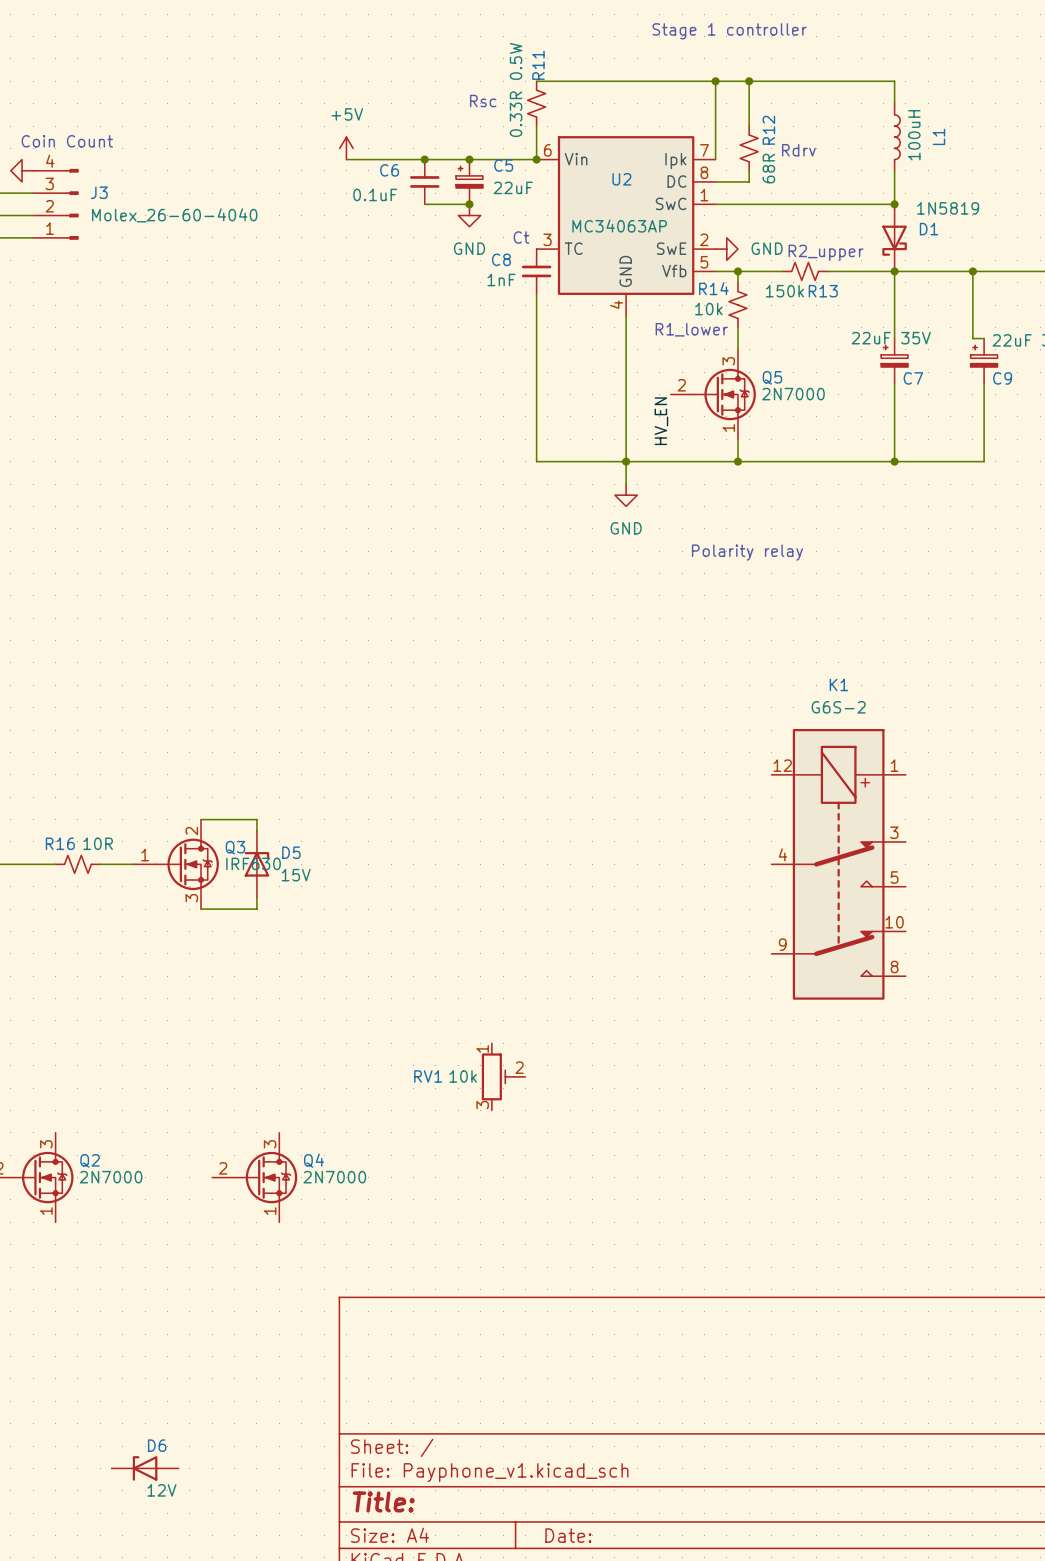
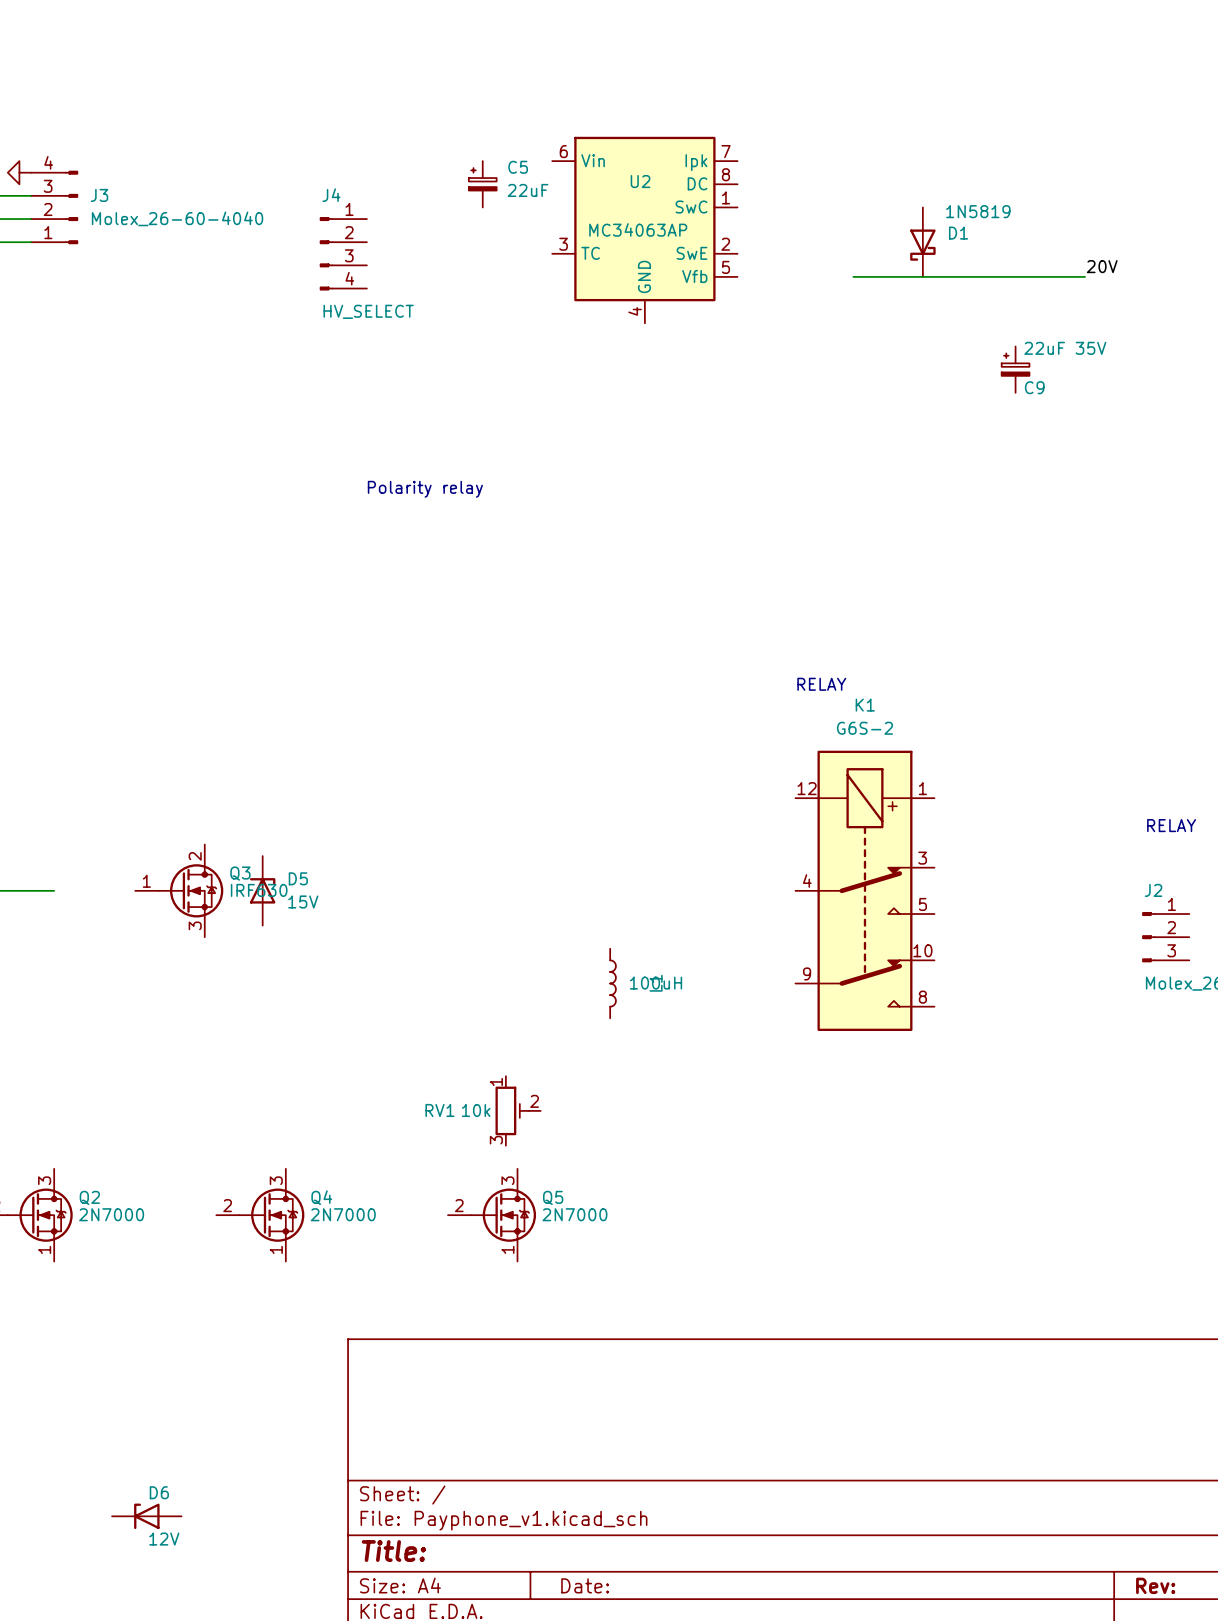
text: Stage 1 controller (729, 31) -> none
wire: (536, 81) (894, 81) (894, 103) -> none
wire: (715, 81) (715, 159) -> none
junction: (715, 81) -> none
wire: (749, 81) (749, 126) -> none
junction: (749, 81) -> none
text: Rsc (483, 101) -> none
R11: 0.33R 0.5W (536, 103) -> none
wire: (536, 126) (536, 159) (346, 159) -> none
L1 value rotation: 0° (914, 135) -> 90° clockwise (656, 983)
L1 position: (897, 137) -> (613, 983)
text: Coin Count (67, 141) -> none
power symbol: +5V (346, 148) -> none
R12: 68R (749, 148) -> none
text: Rdrv (798, 150) -> none
junction: (424, 159) -> none
junction: (469, 159) -> none
junction: (536, 159) -> none
wire: (749, 170) (749, 181) (715, 181) -> none
wire: (894, 170) (894, 204) (715, 204) -> none
C6: 0.1uF (424, 181) -> none
wire: (424, 204) (469, 204) -> none
junction: (469, 204) -> none
junction: (894, 204) -> none
power symbol: GND (469, 215) -> none
text: Ct (521, 237) -> none
J4: none -> HV_SELECT (343, 253)
power symbol: GND (726, 249) -> none
text: R2_upper (826, 252) -> none
C8: 1nF (536, 271) -> none
wire: (715, 271) (782, 271) -> none
wire: (737, 271) (737, 282) -> none
junction: (737, 271) -> none
R13: 150k (805, 271) -> none
wire: (894, 271) (894, 338) -> none
junction: (894, 271) -> none
wire: (972, 271) (972, 338) (984, 338) -> none
junction: (972, 271) -> none
wire: (536, 293) (536, 461) (984, 461) (984, 383) -> none
R14: 10k (737, 305) -> none
wire: (626, 316) (626, 484) -> none
wire: (737, 327) (737, 349) -> none
text: R1_lower (691, 329) -> none
C7: 22uF 35V (894, 360) -> none
wire: (894, 383) (894, 461) -> none
Q5 position: (713, 394) -> (492, 1215)
label: HV_EN (661, 421) -> none
wire: (737, 439) (737, 461) -> none
junction: (626, 461) -> none
junction: (737, 461) -> none
junction: (894, 461) -> none
text: none -> Polarity relay (425, 489)
power symbol: GND (626, 495) -> none
text: Polarity relay (747, 552) -> none
text: none -> RELAY (821, 684)
wire: (201, 819) (256, 819) (256, 830) -> none
R16: 10R (77, 864) -> none
wire: (100, 864) (133, 864) -> none
wire: (256, 897) (256, 909) (201, 909) -> none

